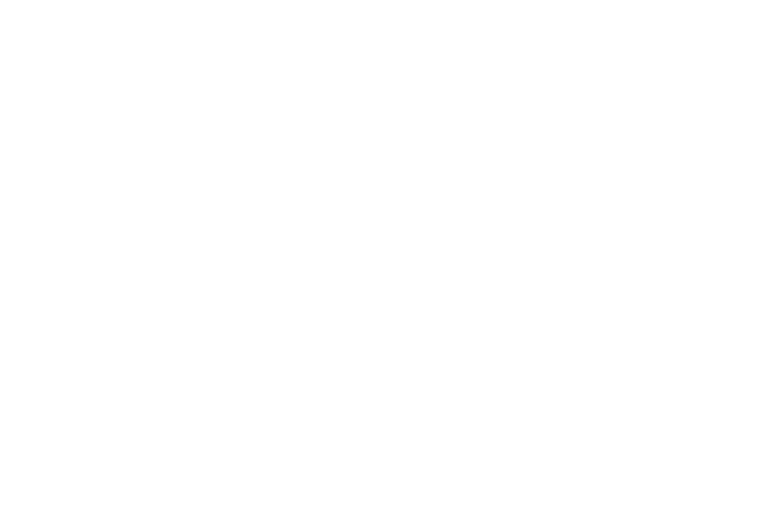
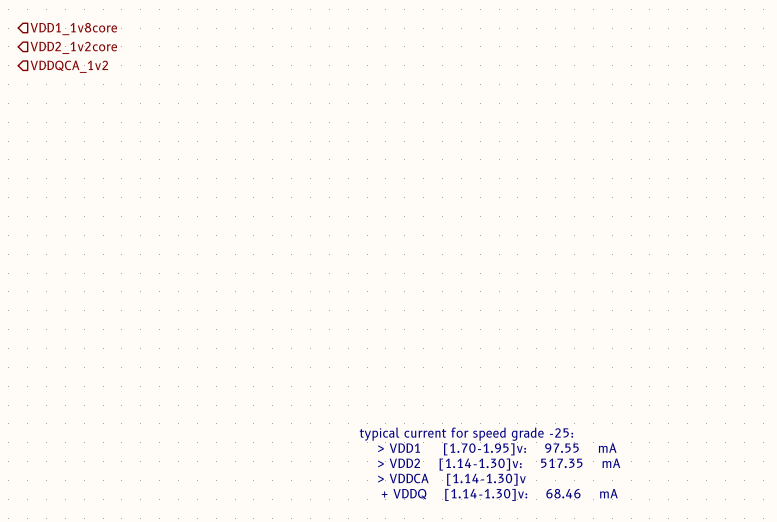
hierarchical label: none -> VDD1_1v8core (73, 29)
hierarchical label: none -> VDD2_1v2core (73, 47)
hierarchical label: none -> VDDQCA_1v2 (69, 66)
text: none -> typical current for speed grade -25: (466, 434)
text: none -> > VDD1 [1.70-1.95]v: 97.55 mA (497, 449)
text: none -> > VDD2 [1.14-1.30]v: 517.35 mA (499, 464)
text: none -> > VDDCA [1.14-1.30]v (451, 479)
text: none -> + VDDQ [1.14-1.30]v: 68.46 mA (499, 494)

